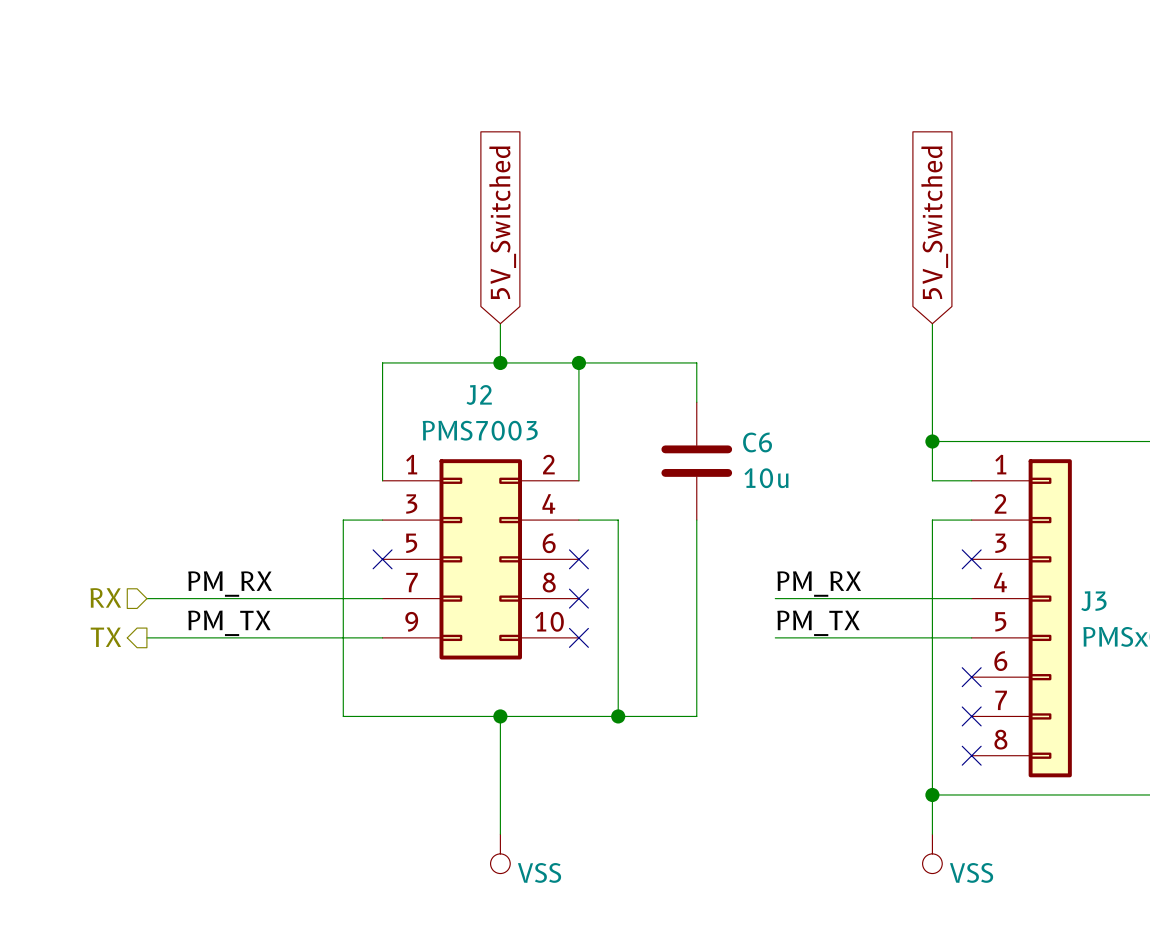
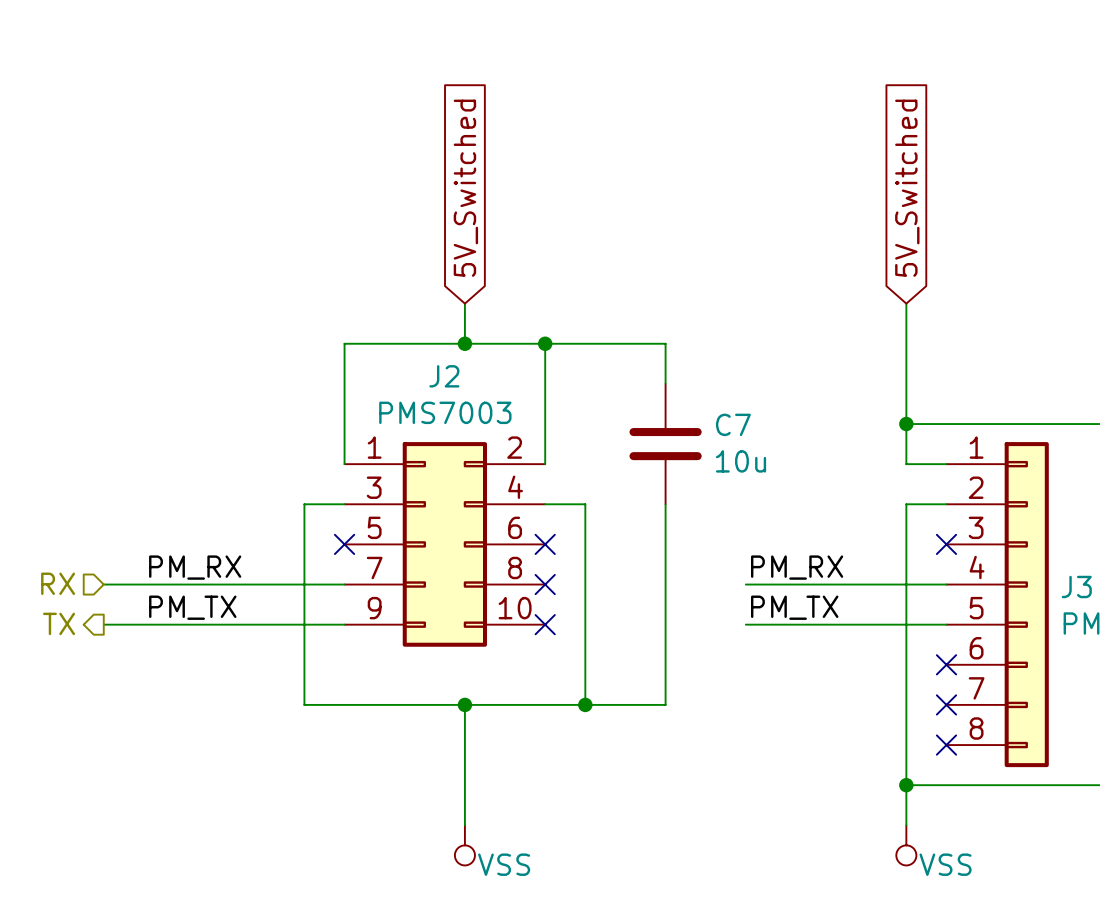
C6 name: C6 (757, 442) -> C7 (733, 424)

